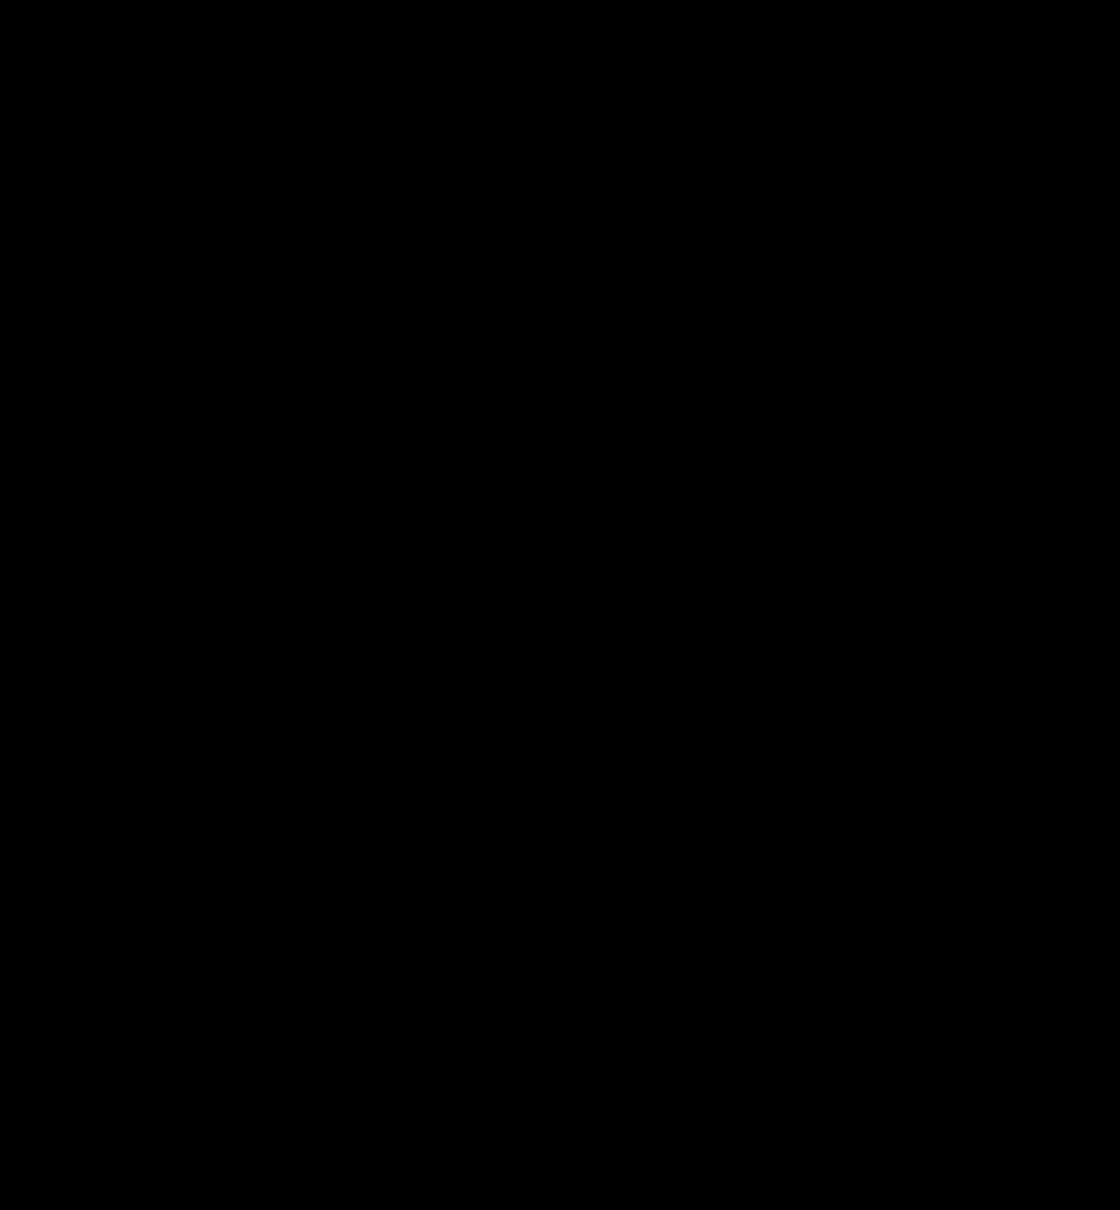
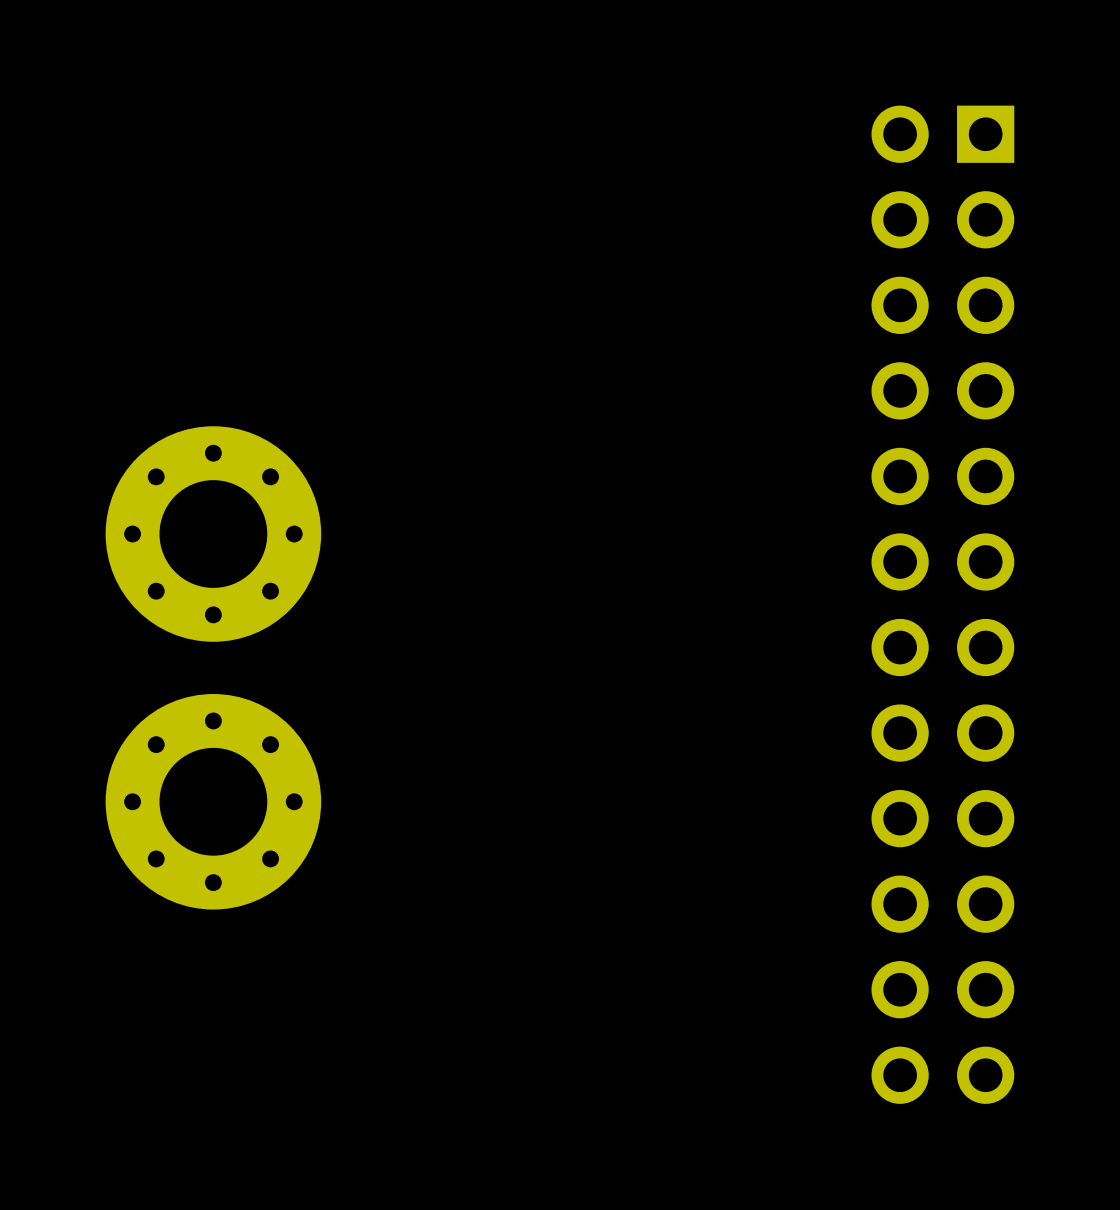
part: none -> (213, 534)
part: none -> (942, 604)
part: none -> (213, 801)

